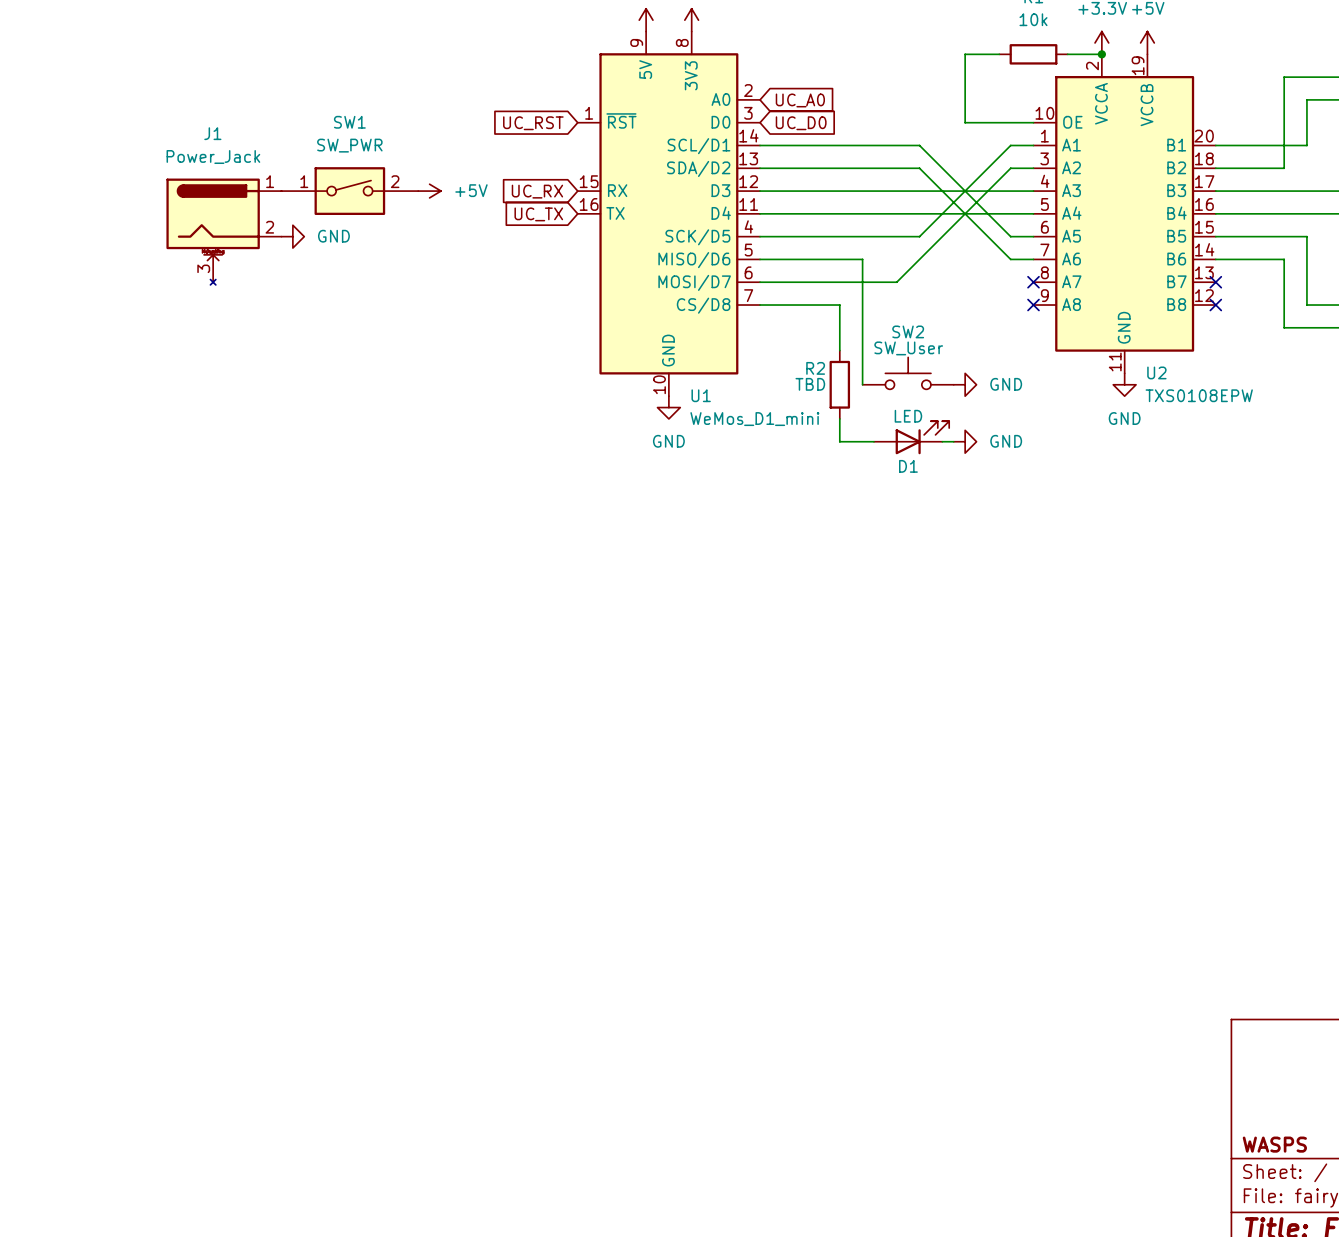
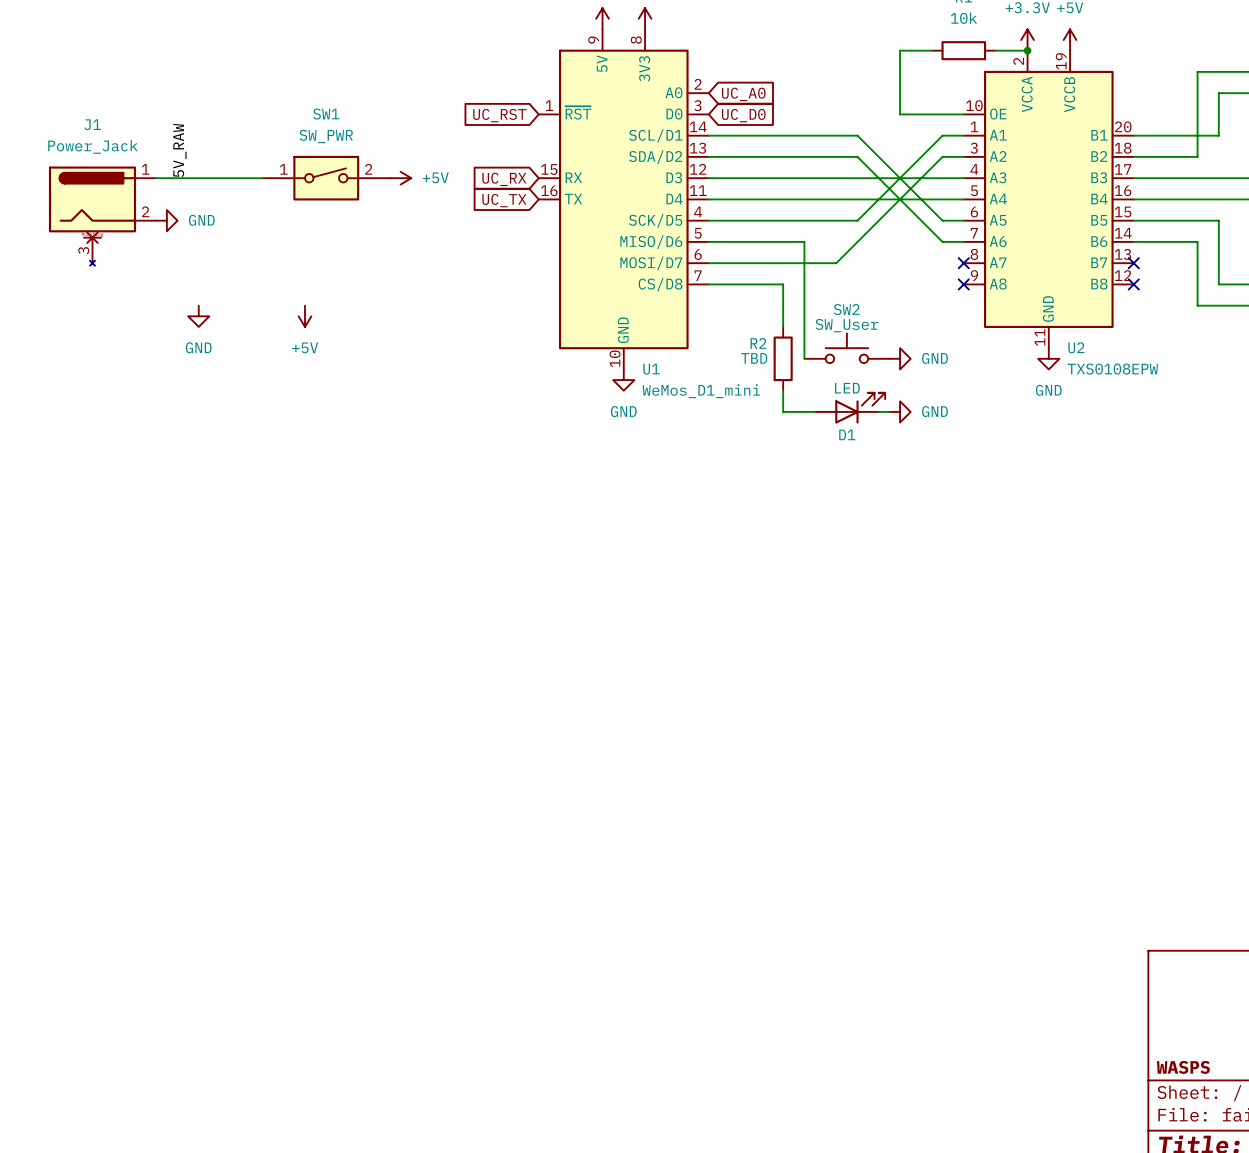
label: none -> 5V_RAW (179, 150)
J1 position: (223, 231) -> (102, 216)
power symbol: none -> GND (166, 220)
power symbol: GND (292, 236) -> none
power symbol: none -> GND (198, 316)
power symbol: none -> +5V (305, 316)

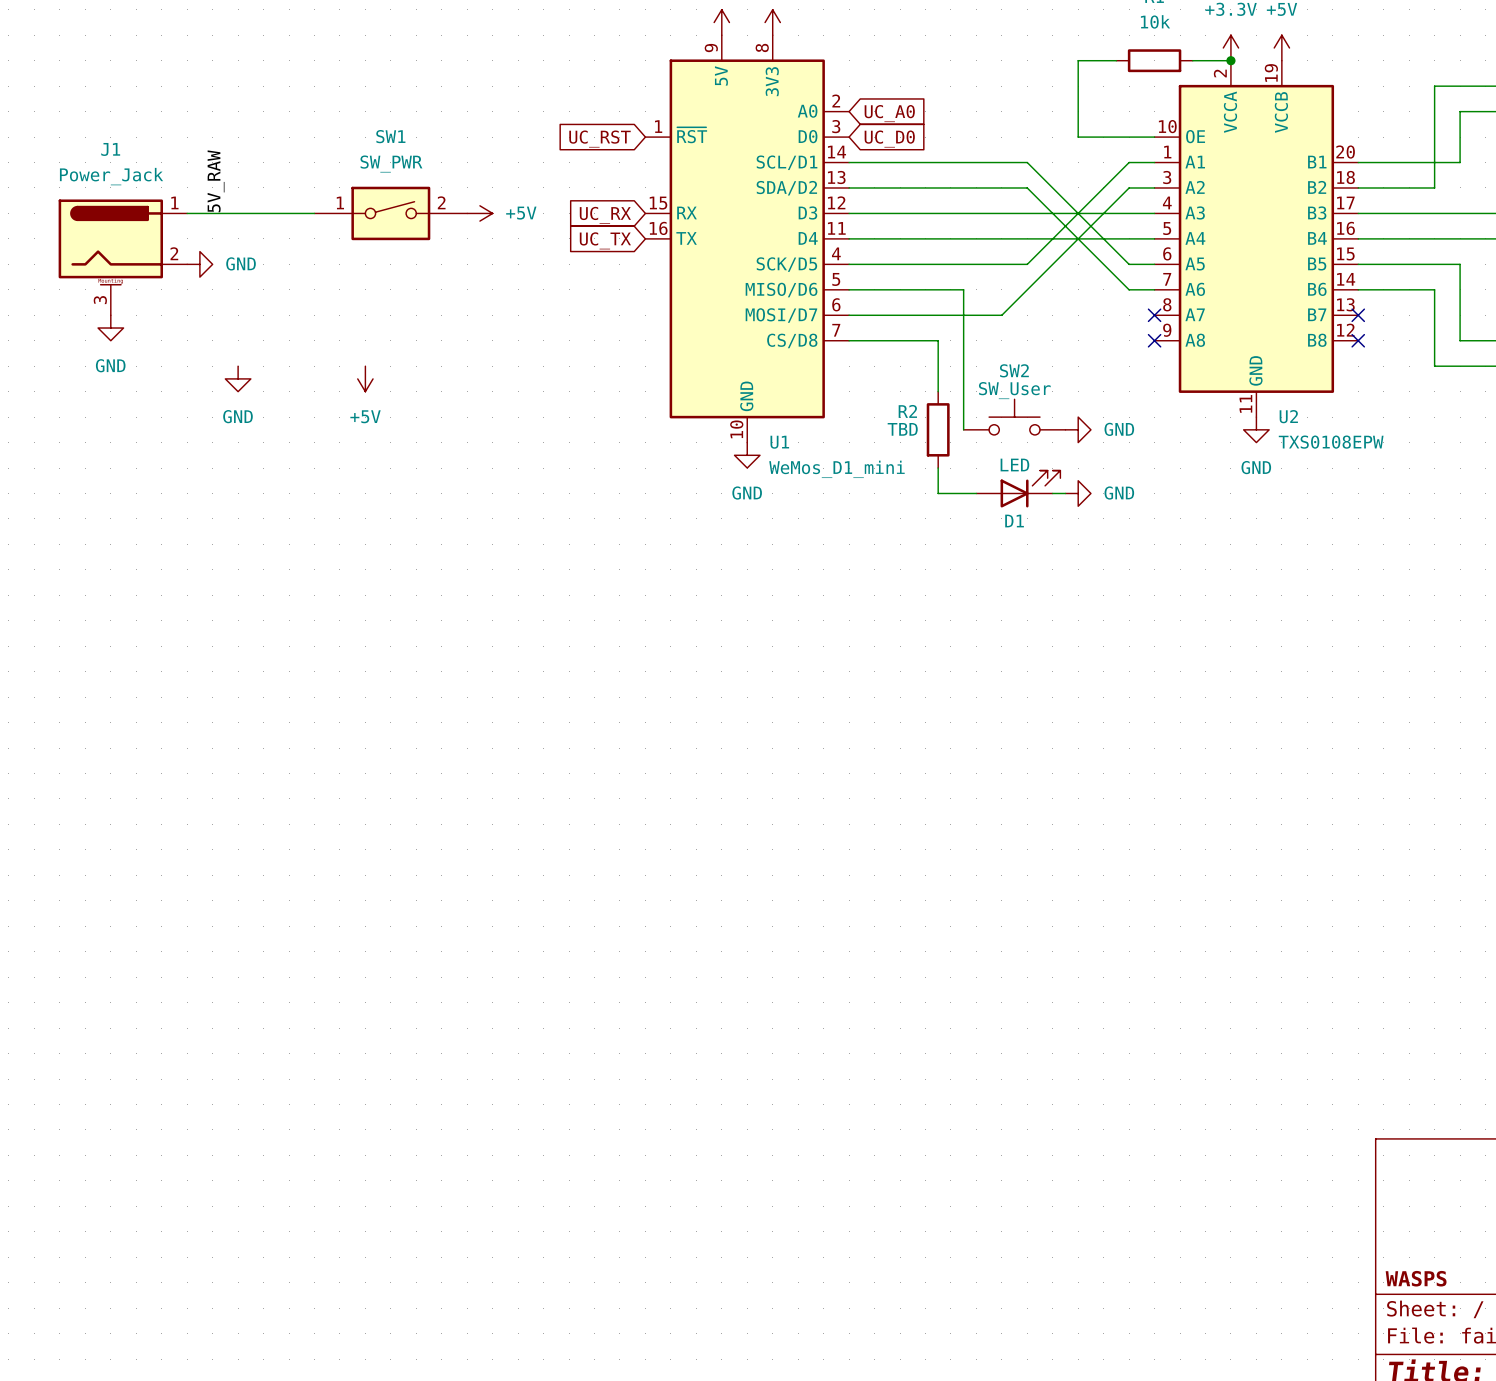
J1 symbol: [48, 166, 157, 266] -> [58, 199, 188, 316]
power symbol: none -> GND (110, 328)

